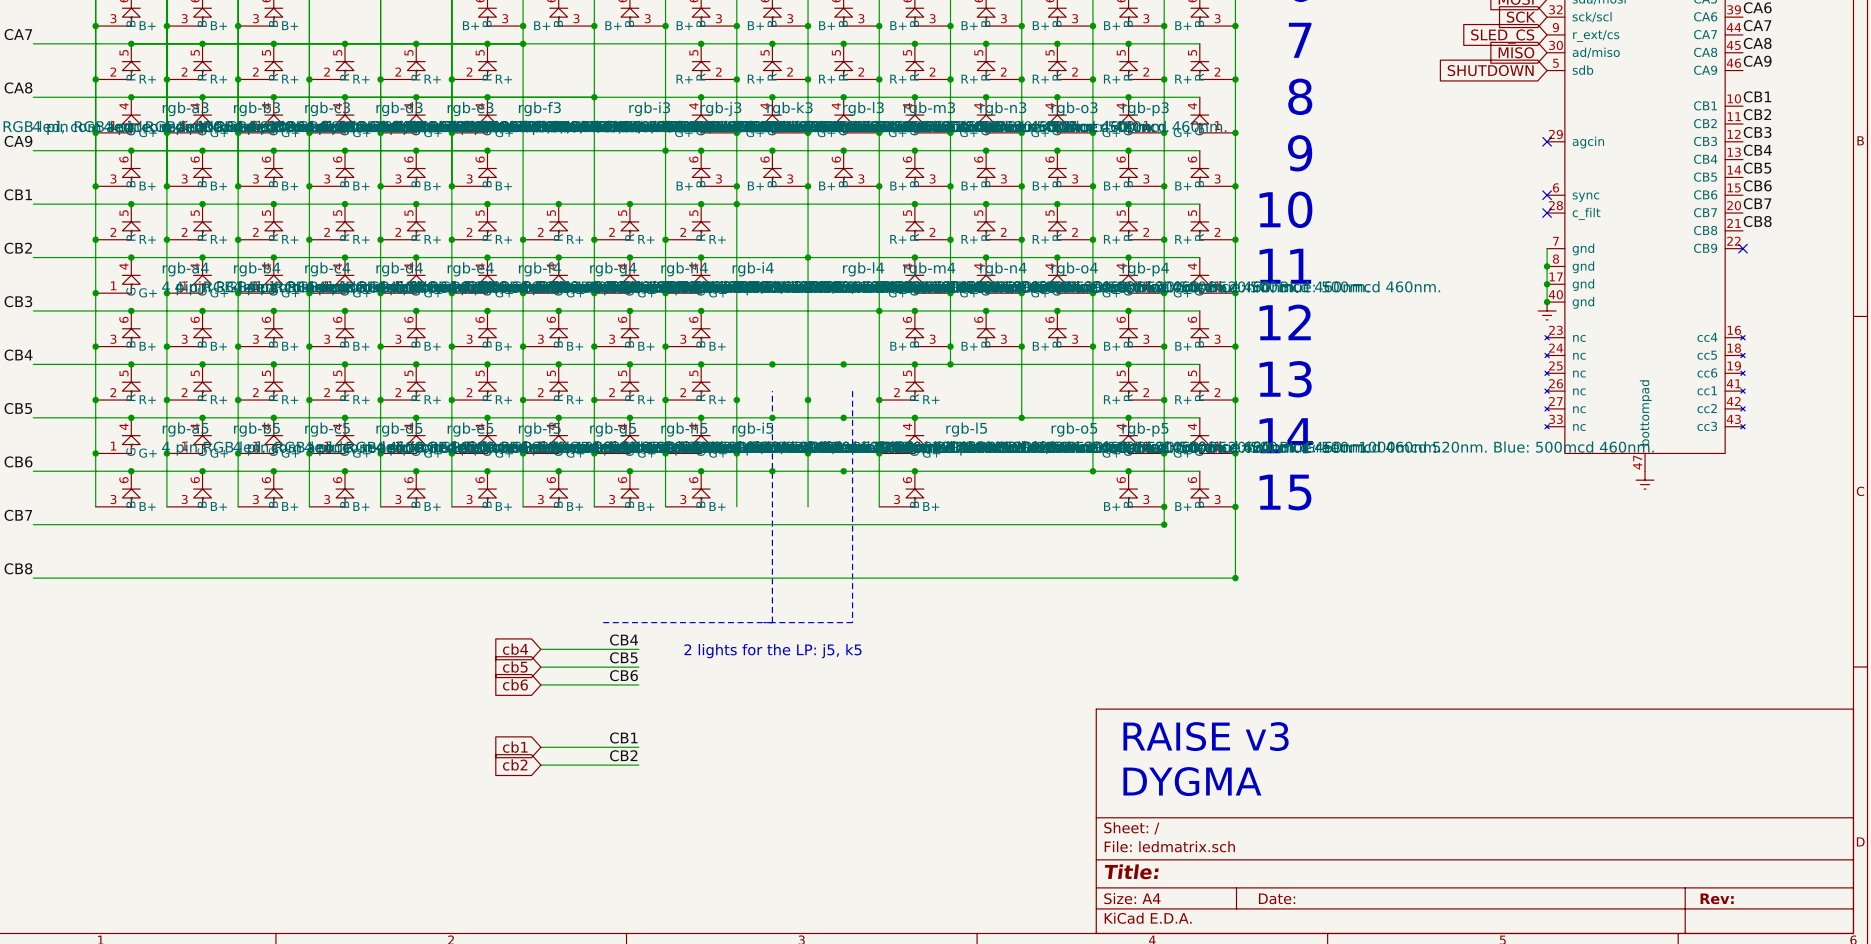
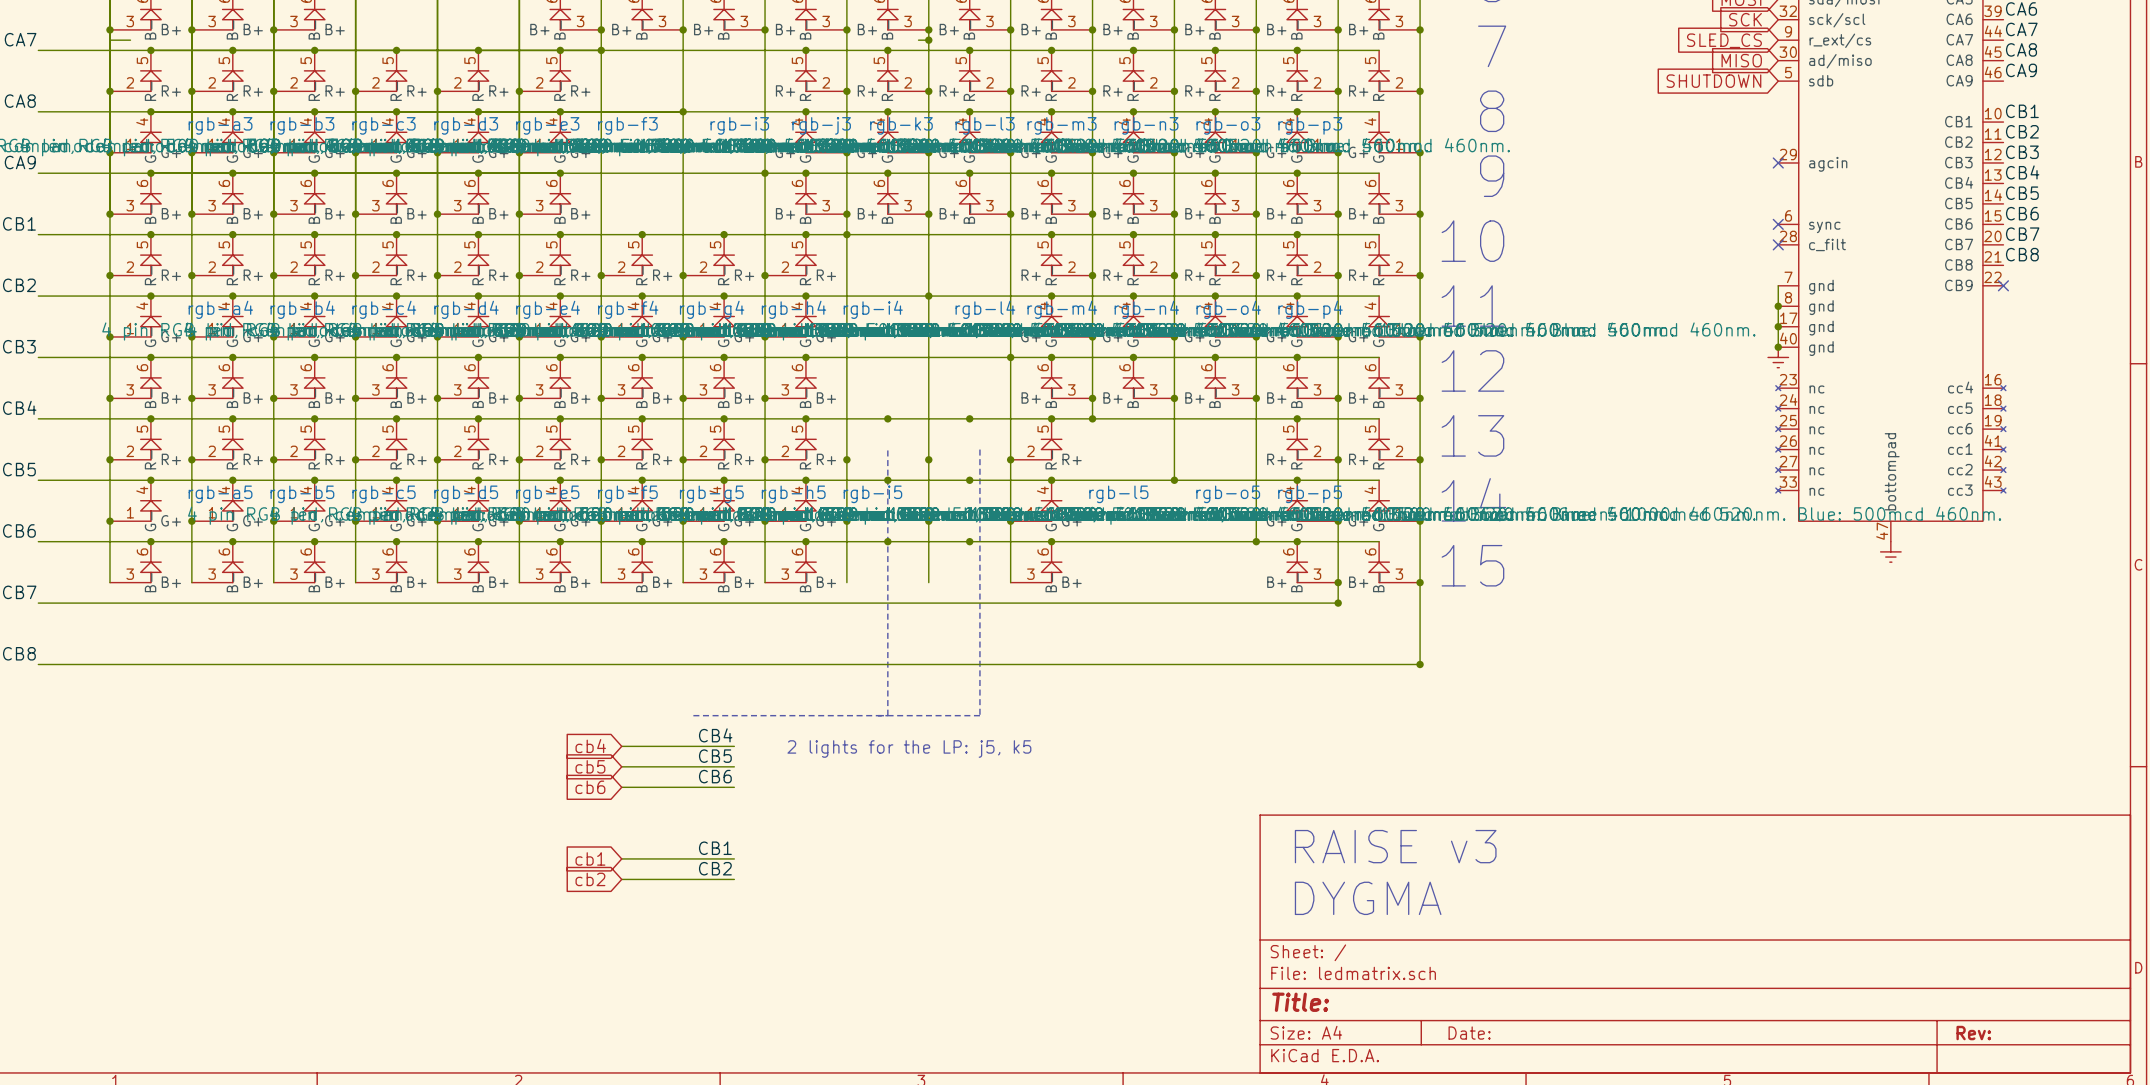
wire: none -> (109, 40) (130, 40)
wire: none -> (918, 40) (928, 40)
junction: none -> (928, 40)

